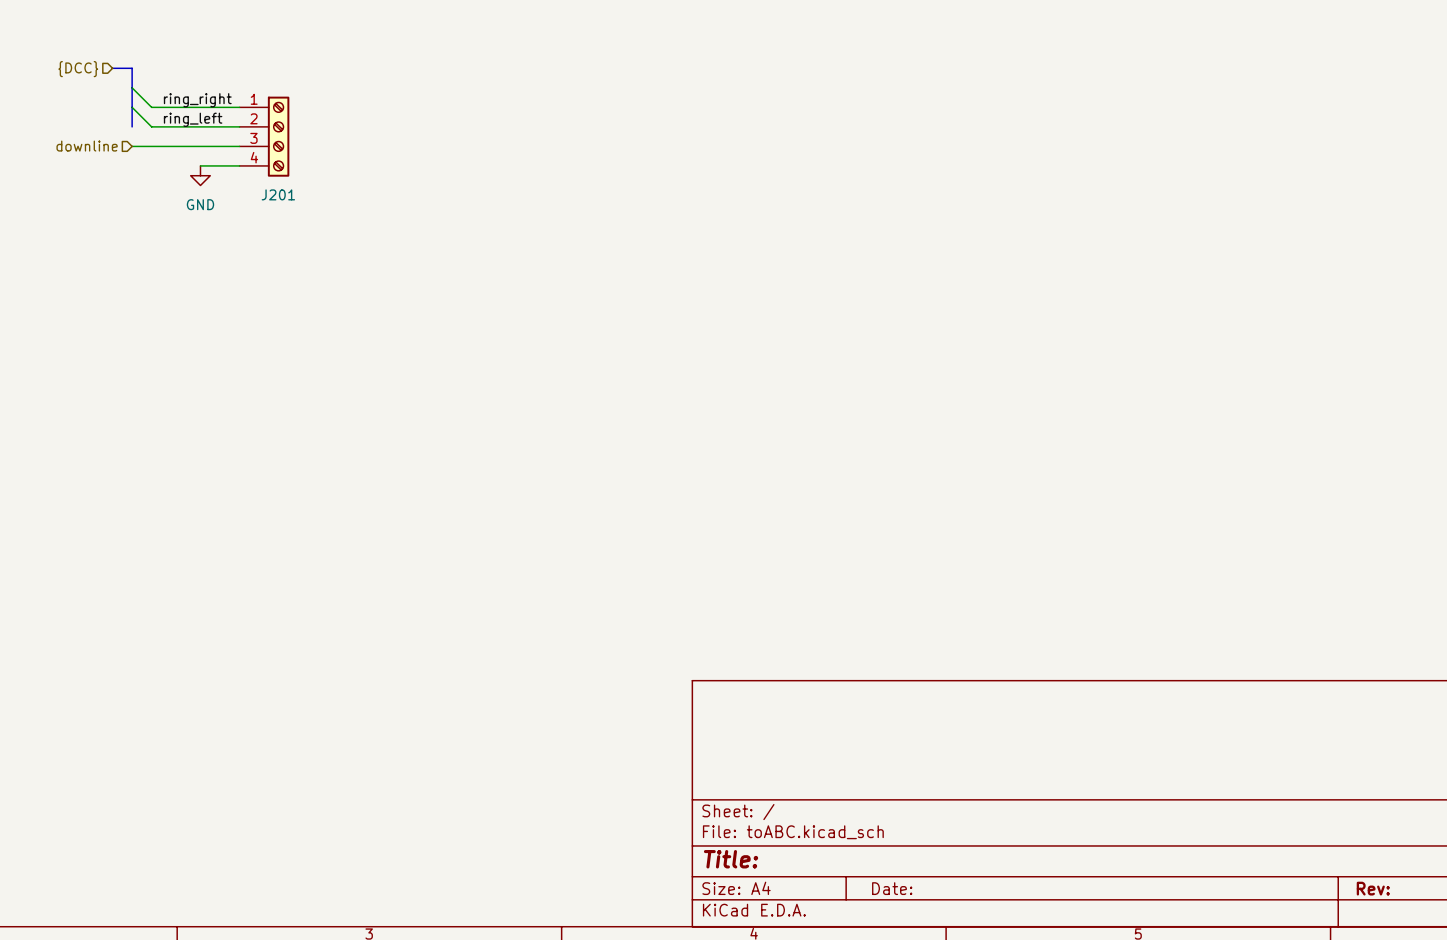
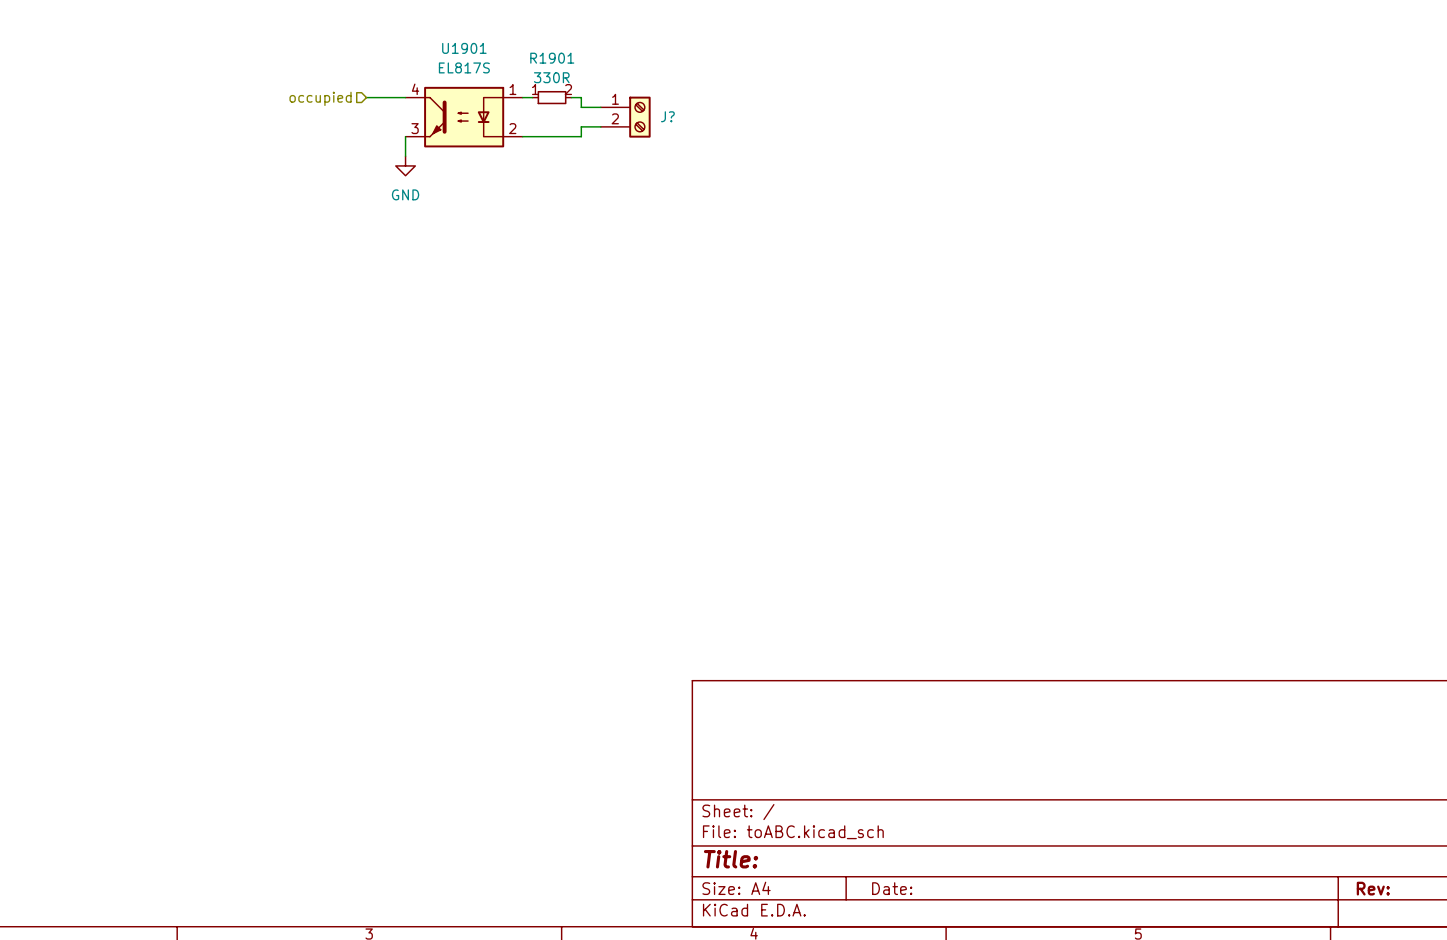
bus: (112, 68) (132, 68) (132, 126) -> none
hierarchical label: {DCC} (78, 69) -> none
wire: (132, 87) (151, 107) (239, 107) -> none
wire: none -> (522, 97) (532, 97)
R1901: none -> 330R (552, 97)
wire: none -> (571, 97) (581, 97) (581, 107) (600, 107)
hierarchical label: none -> occupied (320, 98)
label: ring_right (197, 100) -> none
wire: (132, 107) (151, 126) (239, 126) -> none
U1901: none -> EL817S (464, 117)
J?: none -> (625, 117)
label: ring_left (193, 119) -> none
wire: none -> (600, 126) (581, 126) (581, 136) (522, 136)
J201: (264, 136) -> none
wire: none -> (405, 136) (405, 156)
hierarchical label: downline (87, 146) -> none
wire: (132, 146) (239, 146) -> none
wire: (200, 165) (239, 165) -> (366, 97) (405, 97)
power symbol: none -> GND (405, 165)
power symbol: GND (200, 175) -> none

